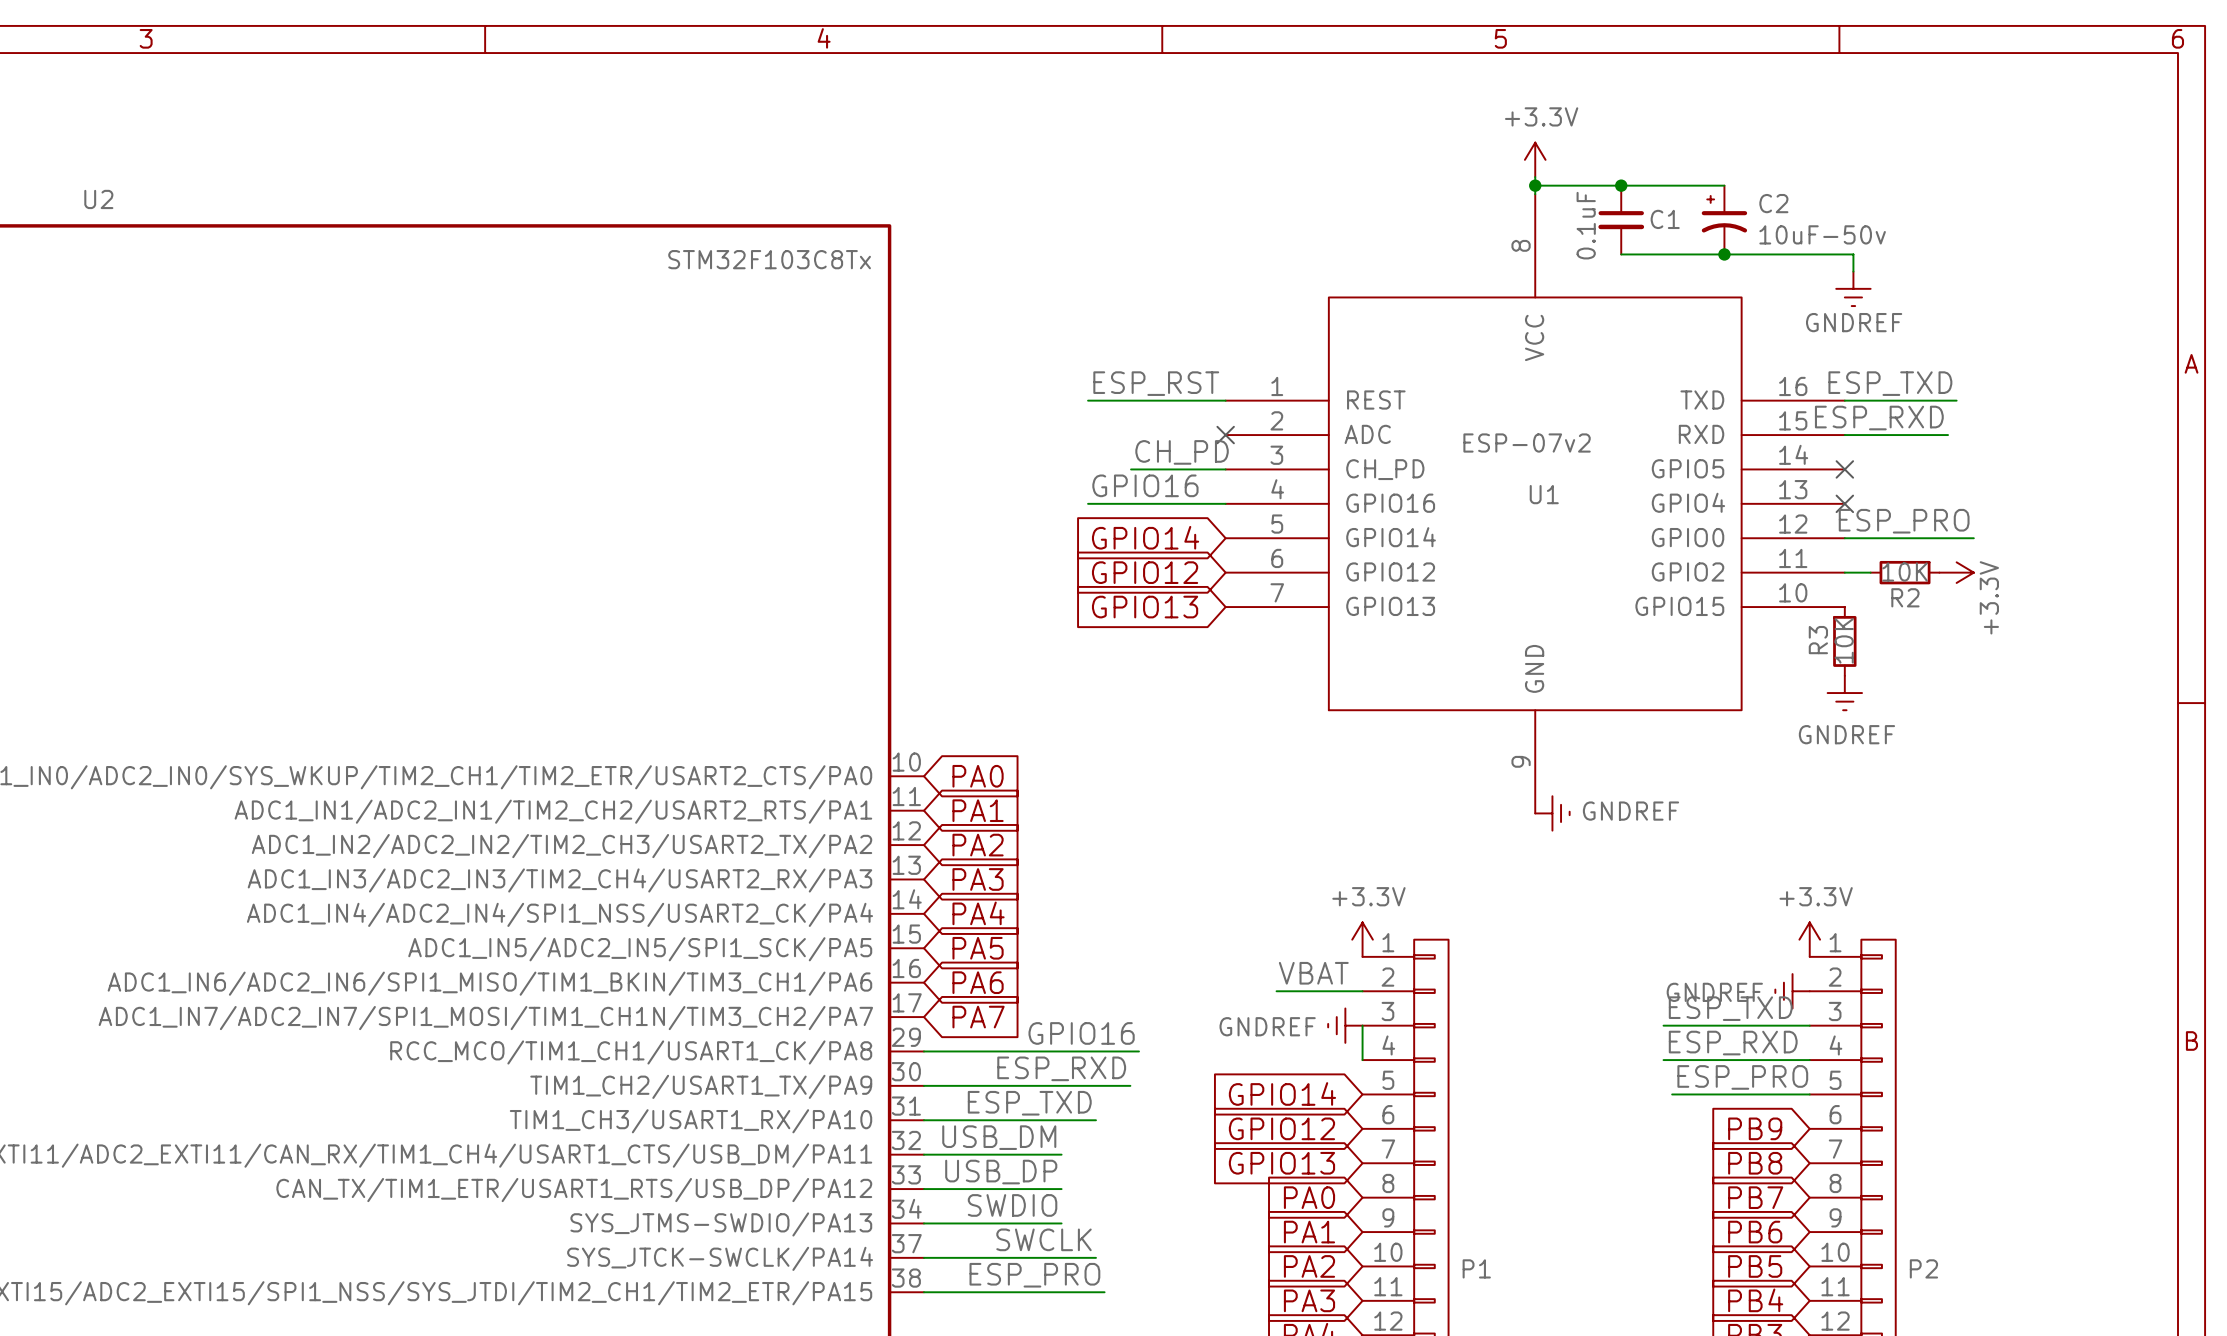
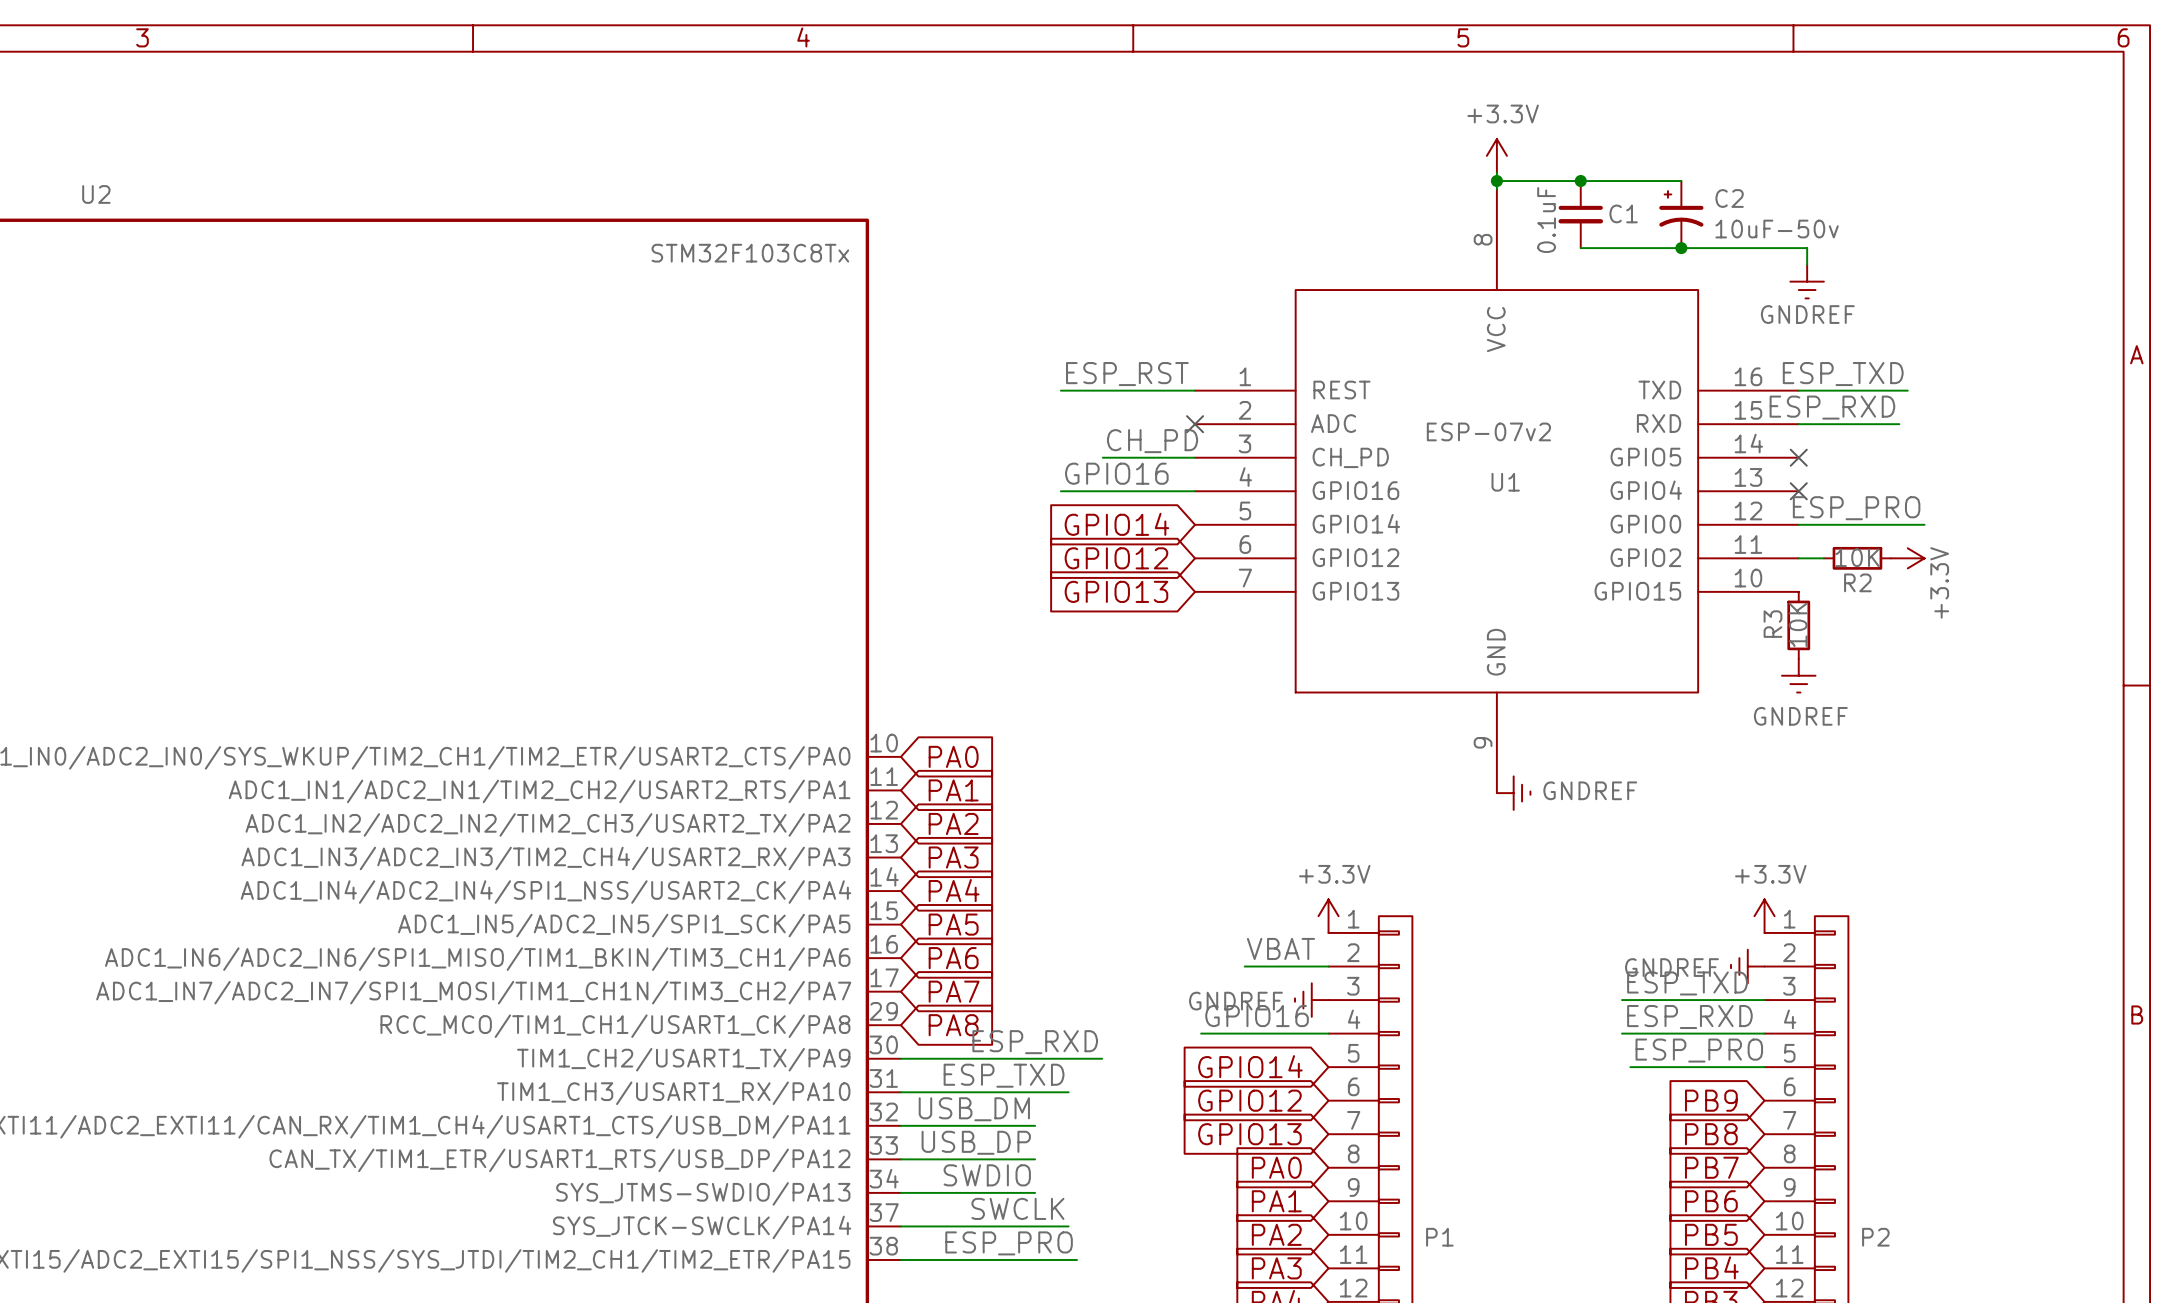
wire: (1362, 1025) (1362, 1060) -> (1201, 1033) (1328, 1033)
label position: GPIO16 (1081, 1033) -> GPIO16 (1257, 1016)
wire: (923, 1051) (1138, 1051) -> none
global label: none -> PA8 (953, 1025)

